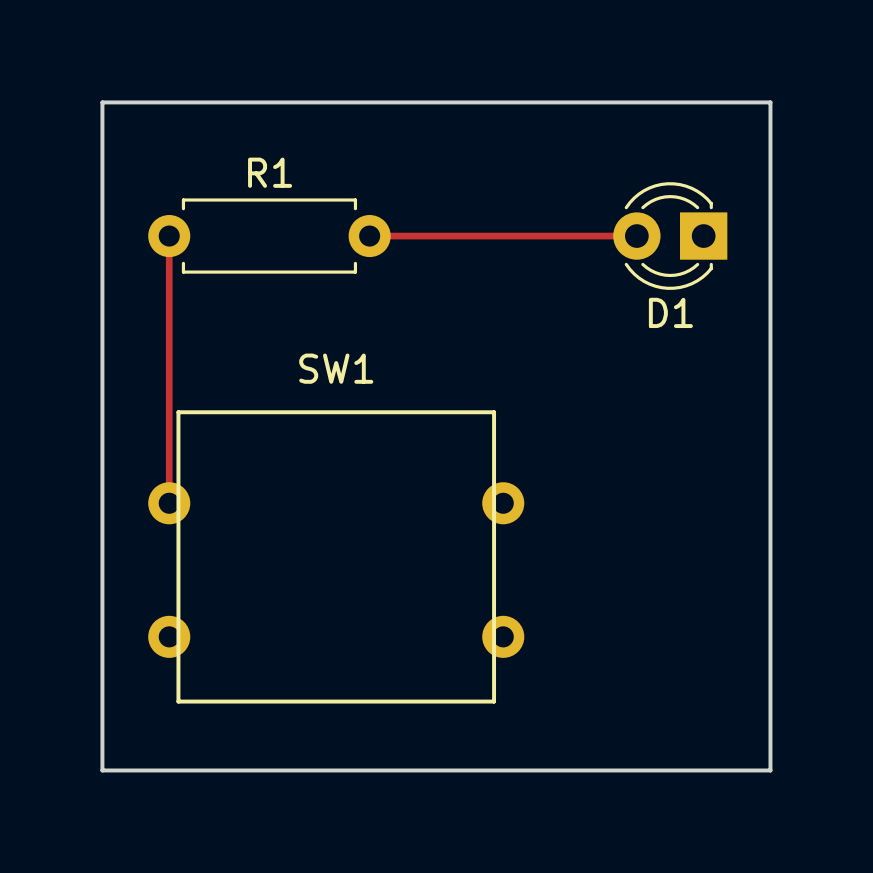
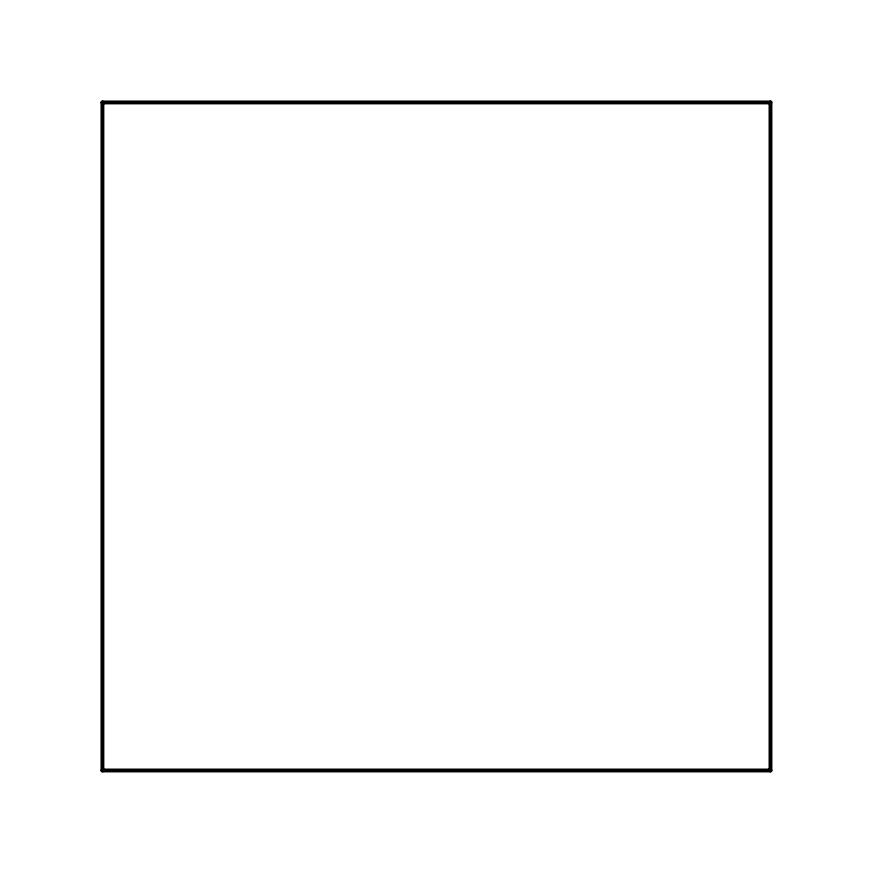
top track: (169, 236) (169, 503) -> none
R1: (269, 236) -> none
top track: (369, 236) (636, 236) -> none
D1: (670, 236) -> none
SW1: (336, 556) -> none

